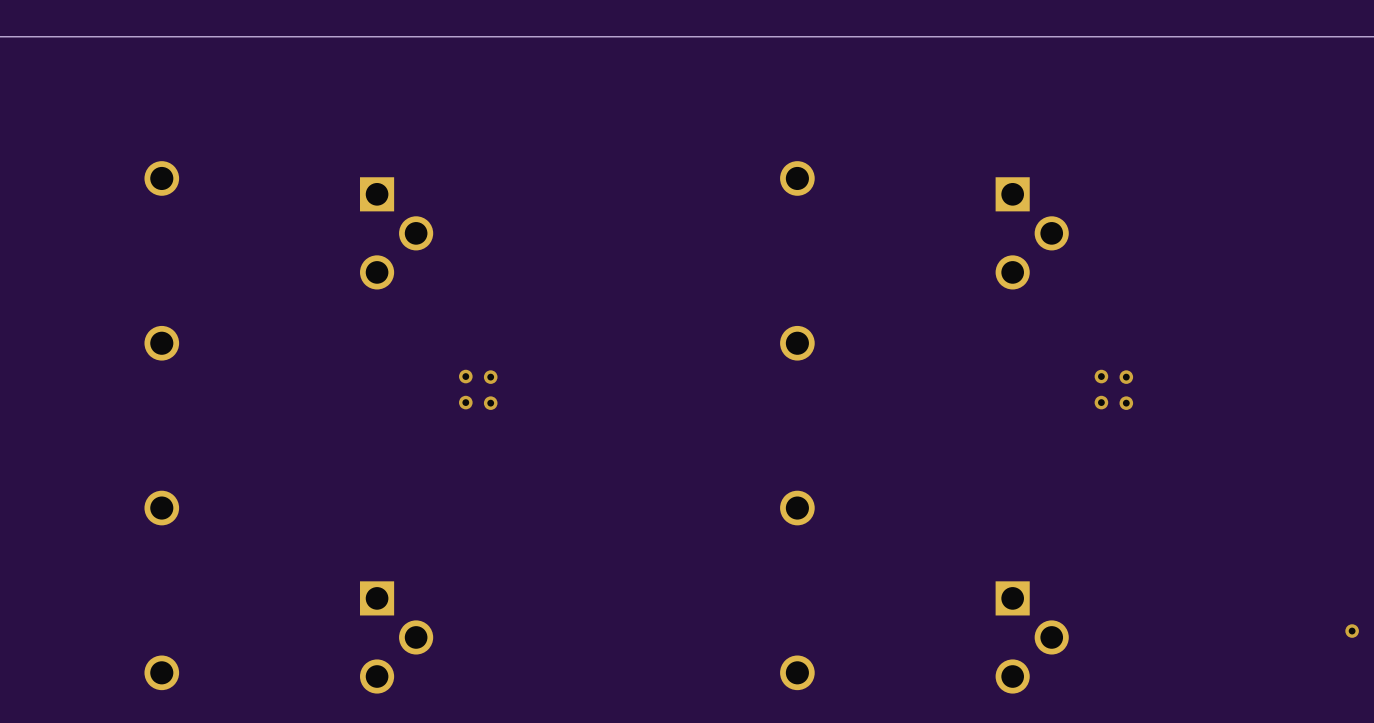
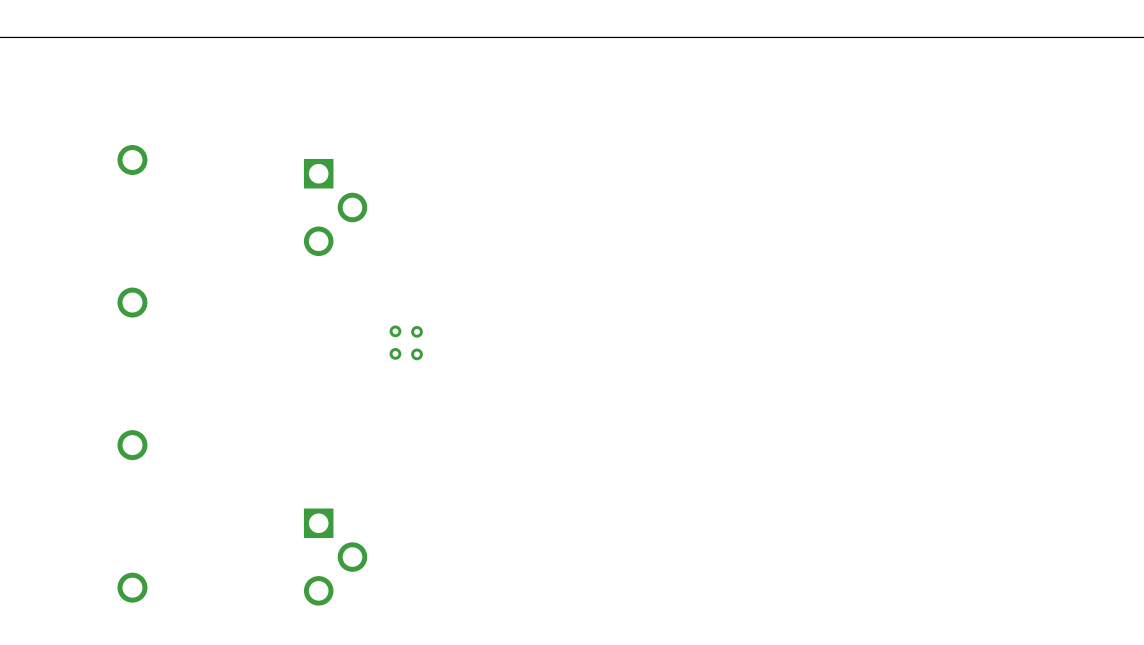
part: (797, 178) -> none
part: (1032, 233) -> none
part: (797, 343) -> none
via: (1101, 376) -> none
via: (1126, 377) -> none
via: (1101, 402) -> none
via: (1126, 403) -> none
part: (797, 508) -> none
part: (1032, 637) -> none
part: (797, 672) -> none

